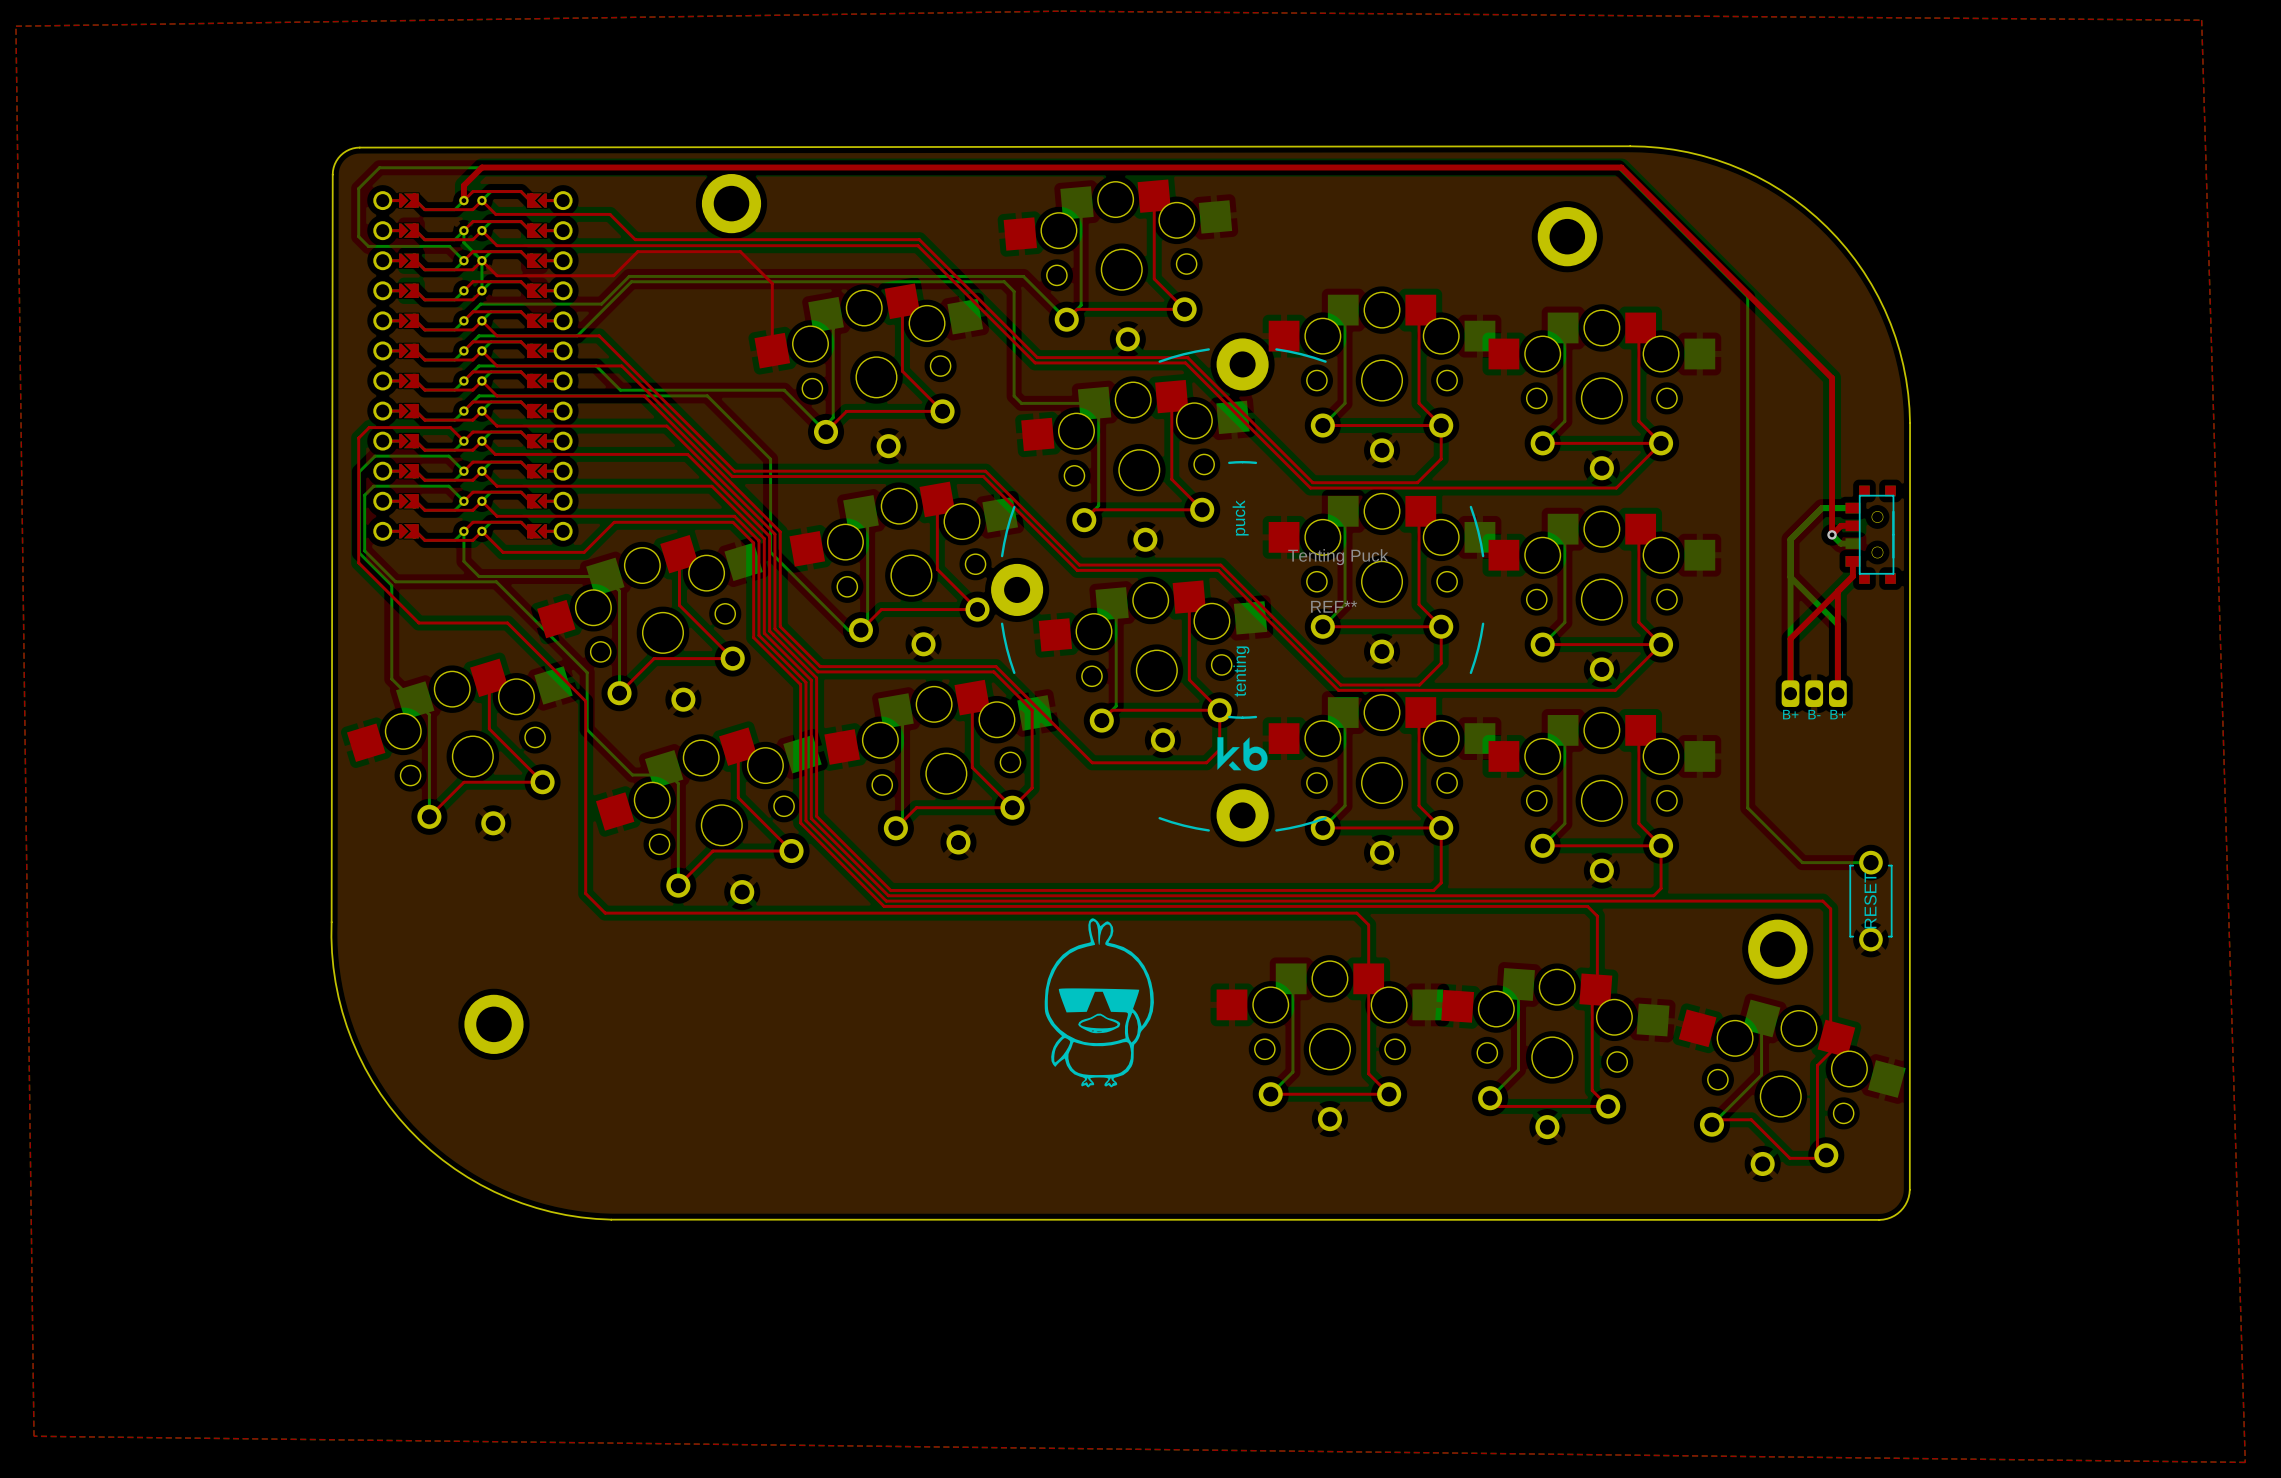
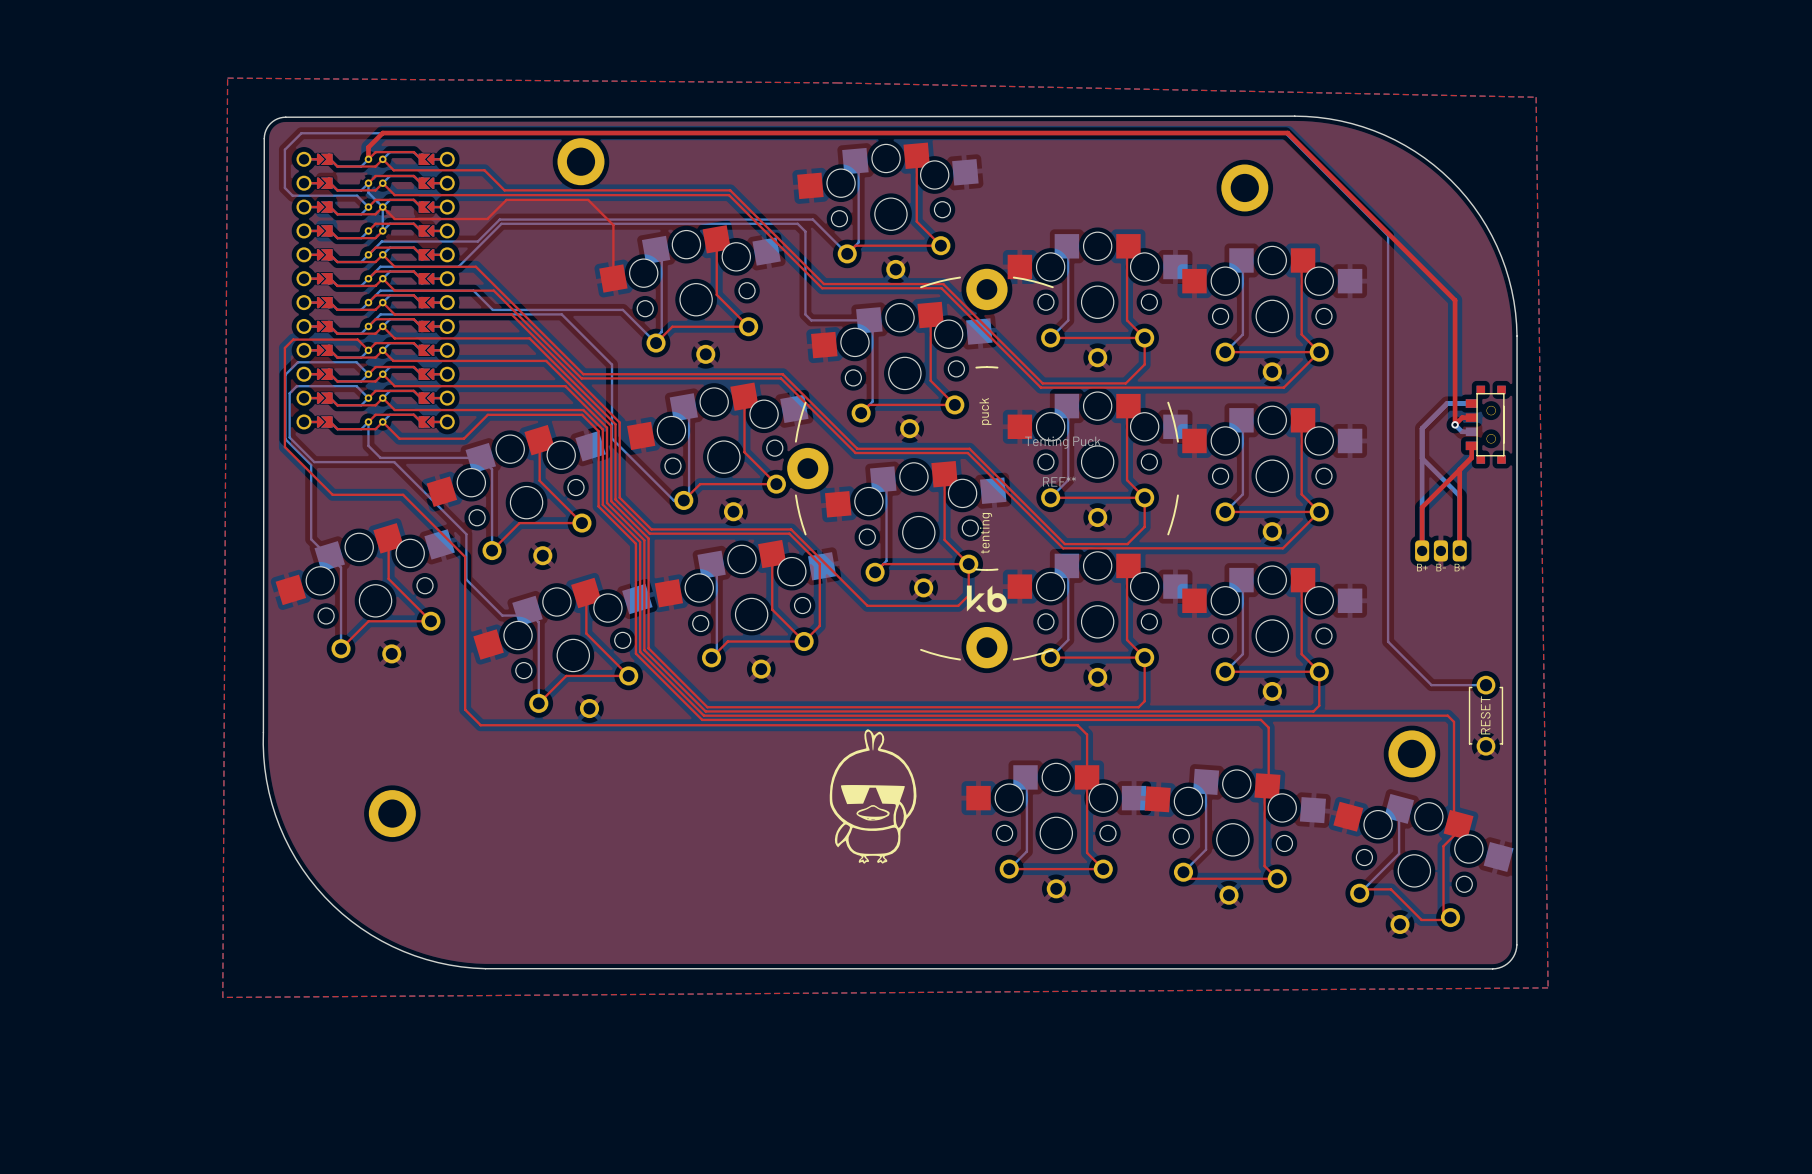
top zone outline: (1060, 11) (15, 26) (34, 1436) (2245, 1462) (2201, 20) (1060, 11) -> (227, 78) (222, 997) (1548, 987) (1536, 97) (836, 82) (227, 78)

